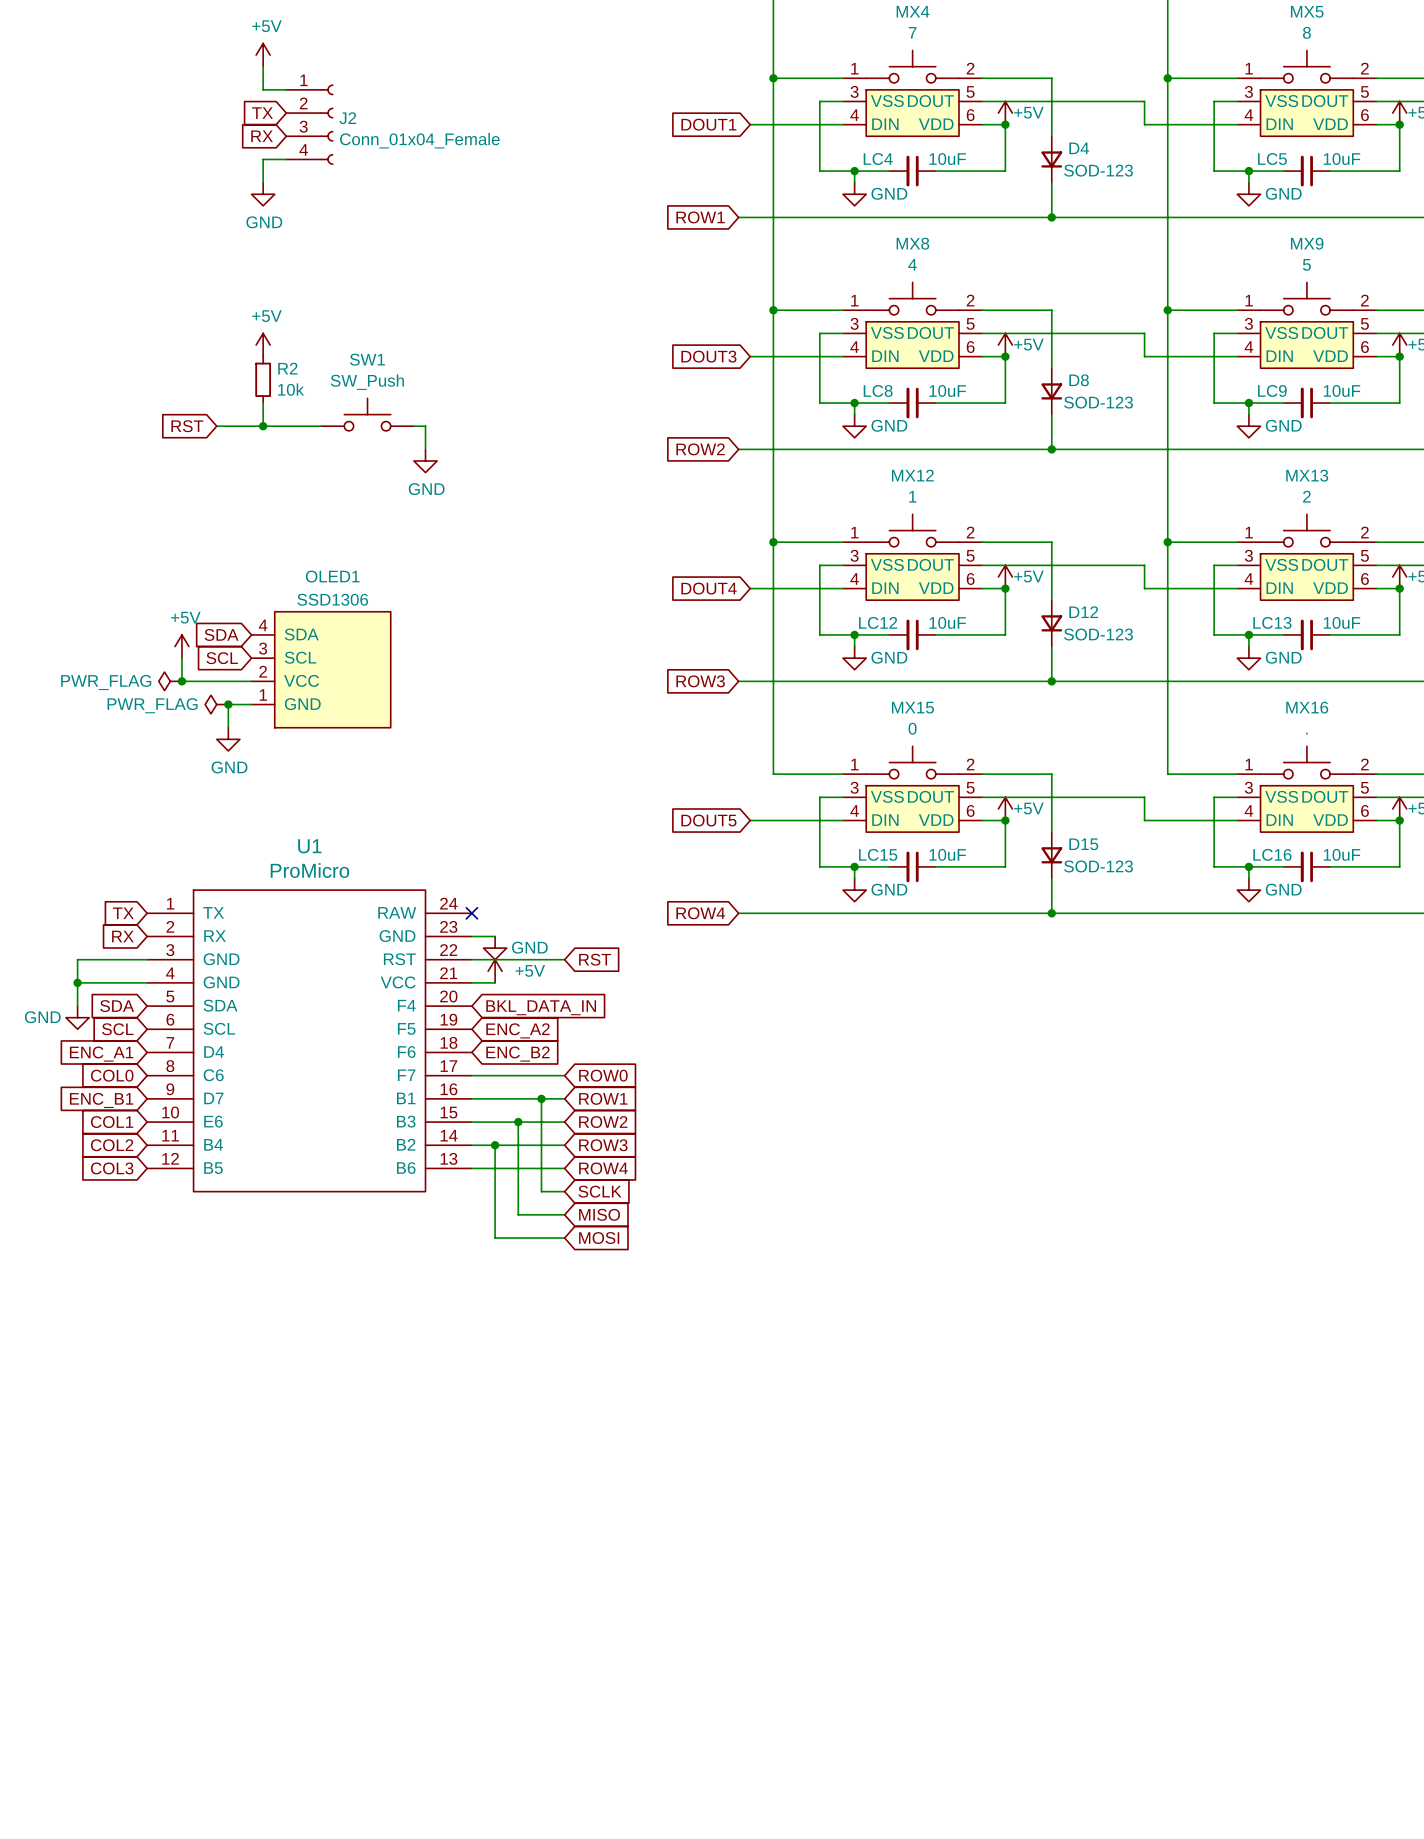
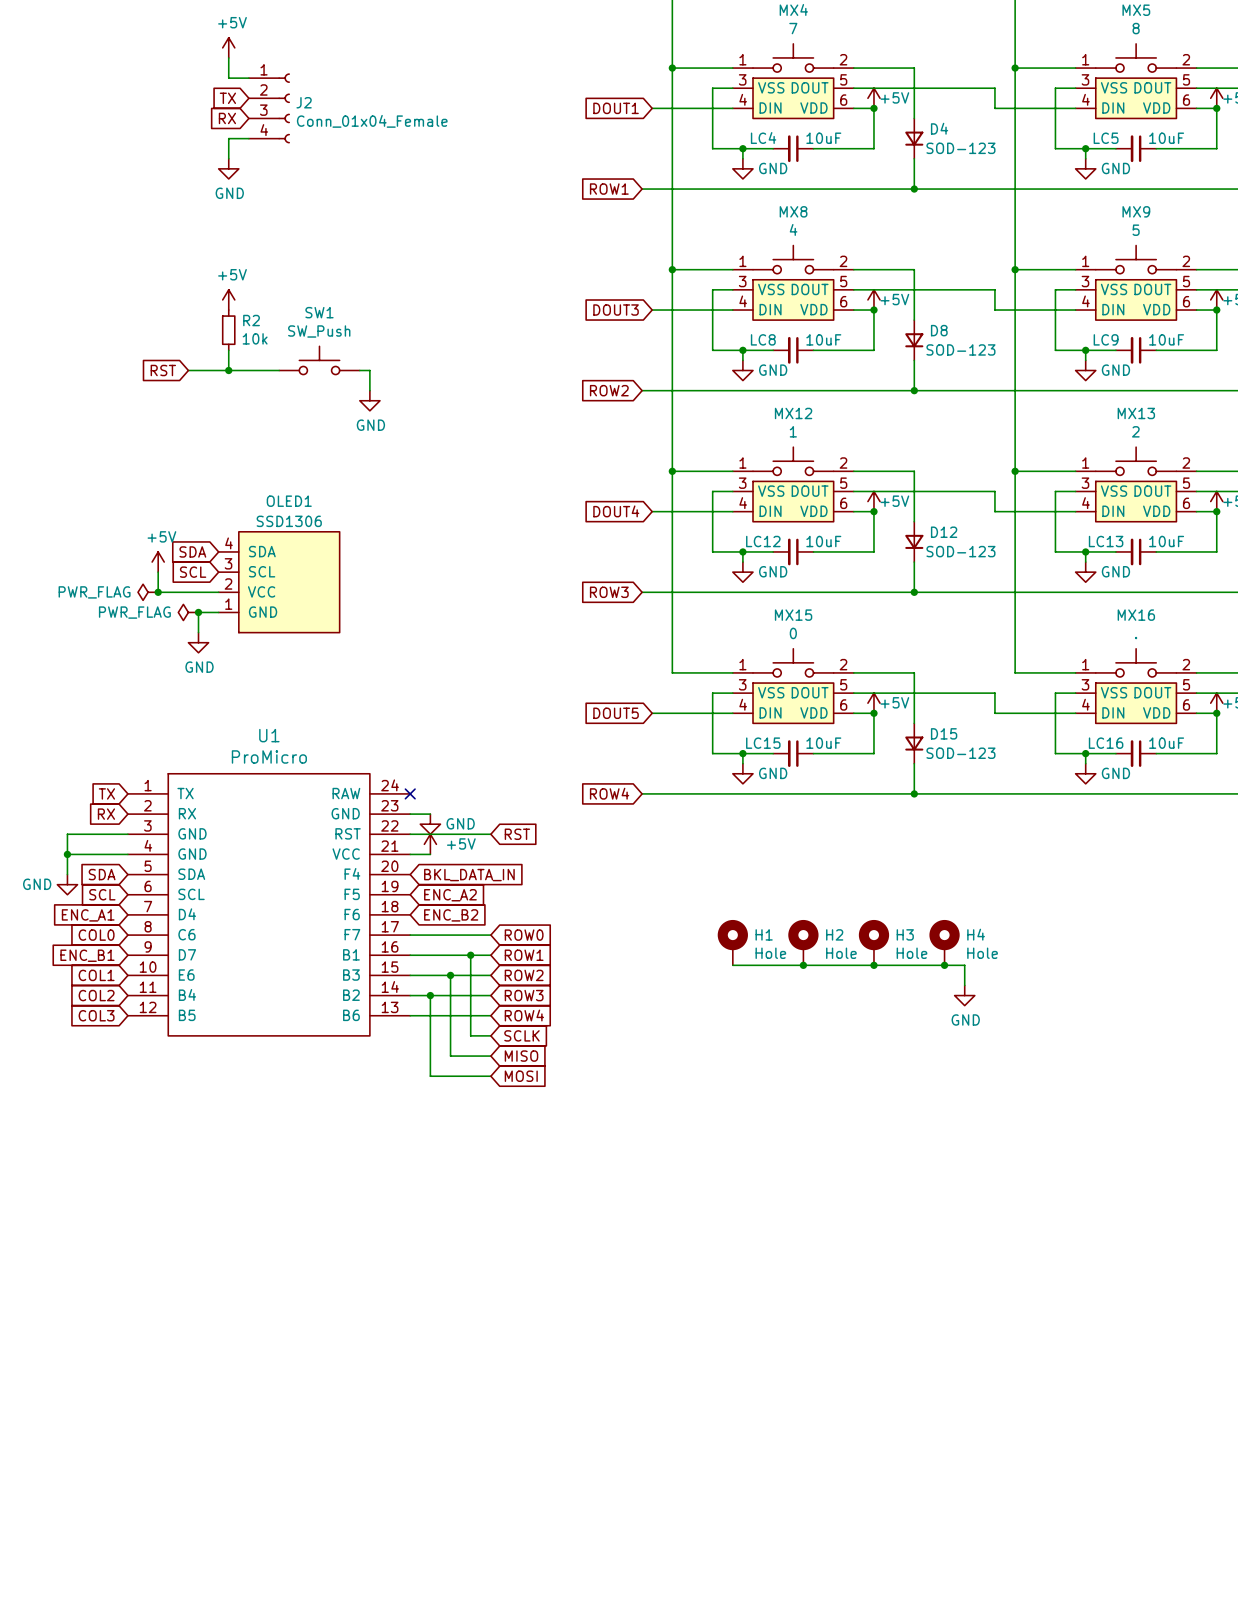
H1: none -> Hole (732, 942)
H2: none -> Hole (803, 942)
H3: none -> Hole (873, 942)
H4: none -> Hole (944, 942)
wire: none -> (732, 965) (964, 965) (964, 985)
junction: none -> (803, 965)
junction: none -> (873, 965)
junction: none -> (944, 965)
power symbol: none -> GND (964, 995)

